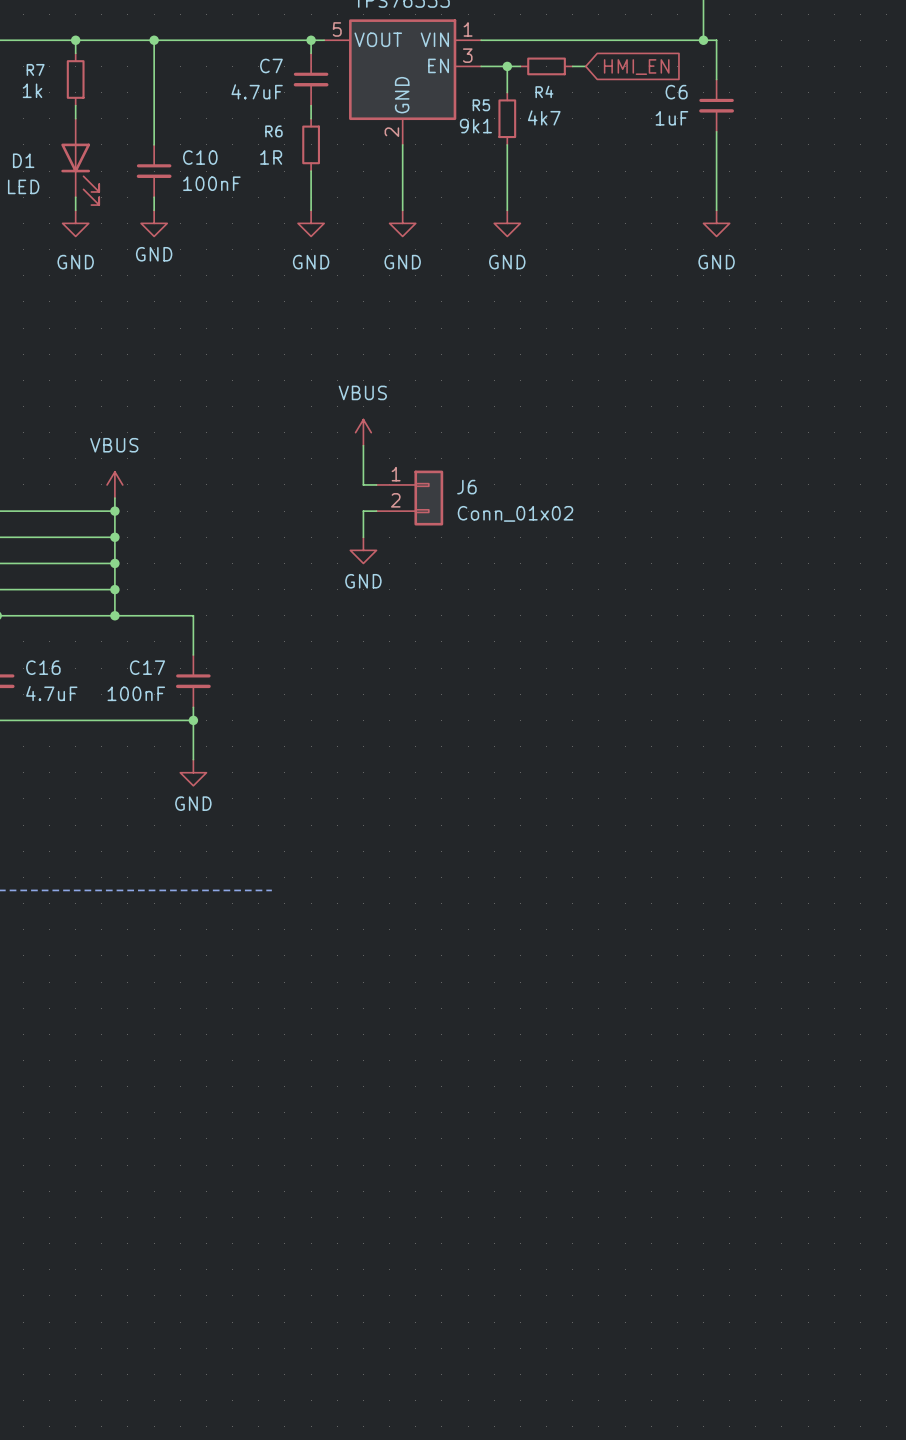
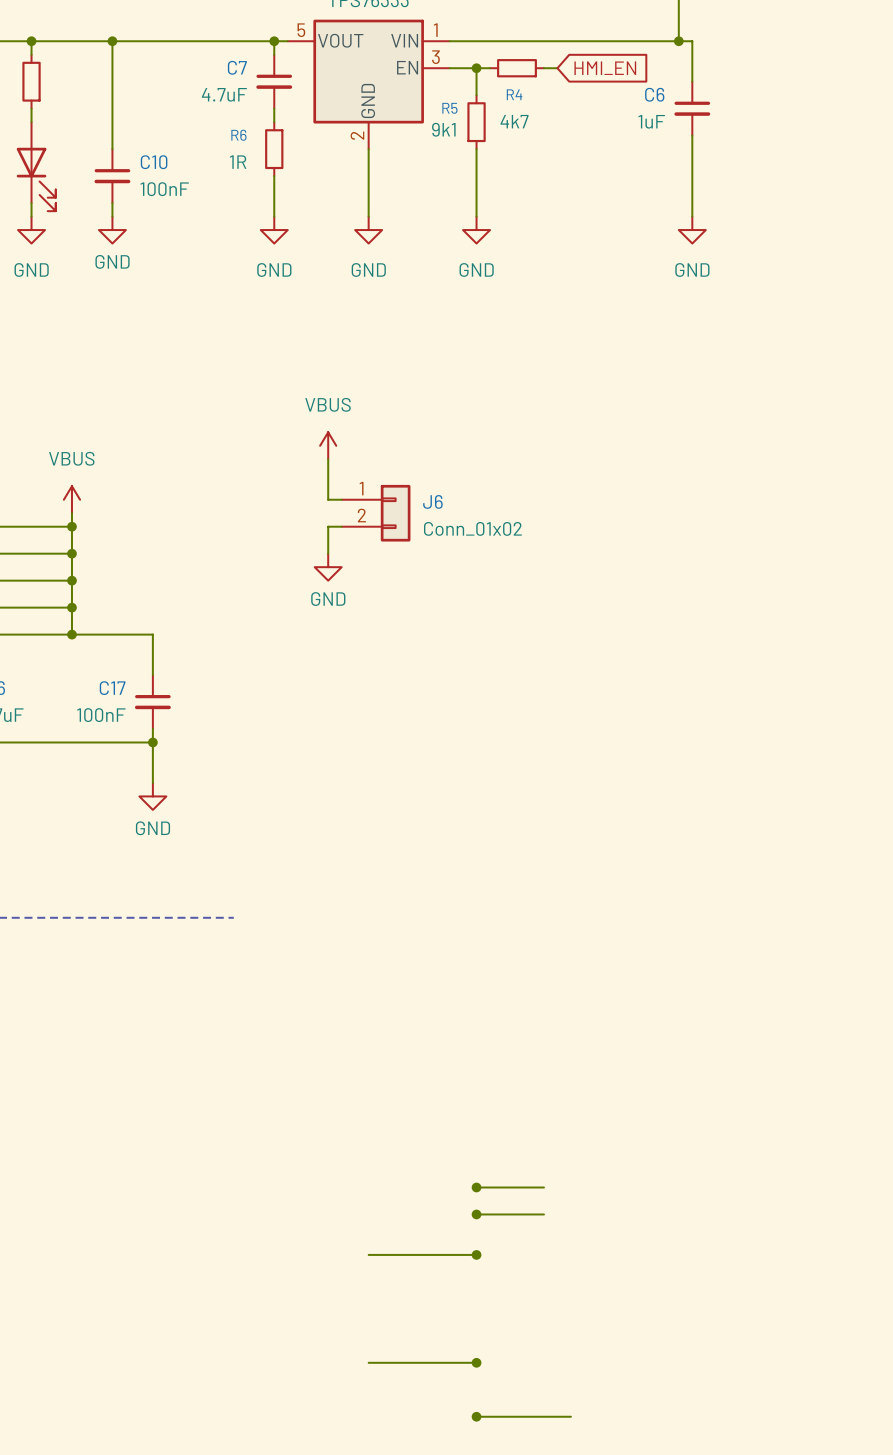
wire: none -> (476, 1187) (543, 1187)
junction: none -> (476, 1187)
wire: none -> (476, 1214) (543, 1214)
junction: none -> (476, 1214)
wire: none -> (368, 1254) (476, 1254)
junction: none -> (476, 1254)
wire: none -> (368, 1362) (476, 1362)
junction: none -> (476, 1362)
wire: none -> (476, 1416) (570, 1416)
junction: none -> (476, 1416)

